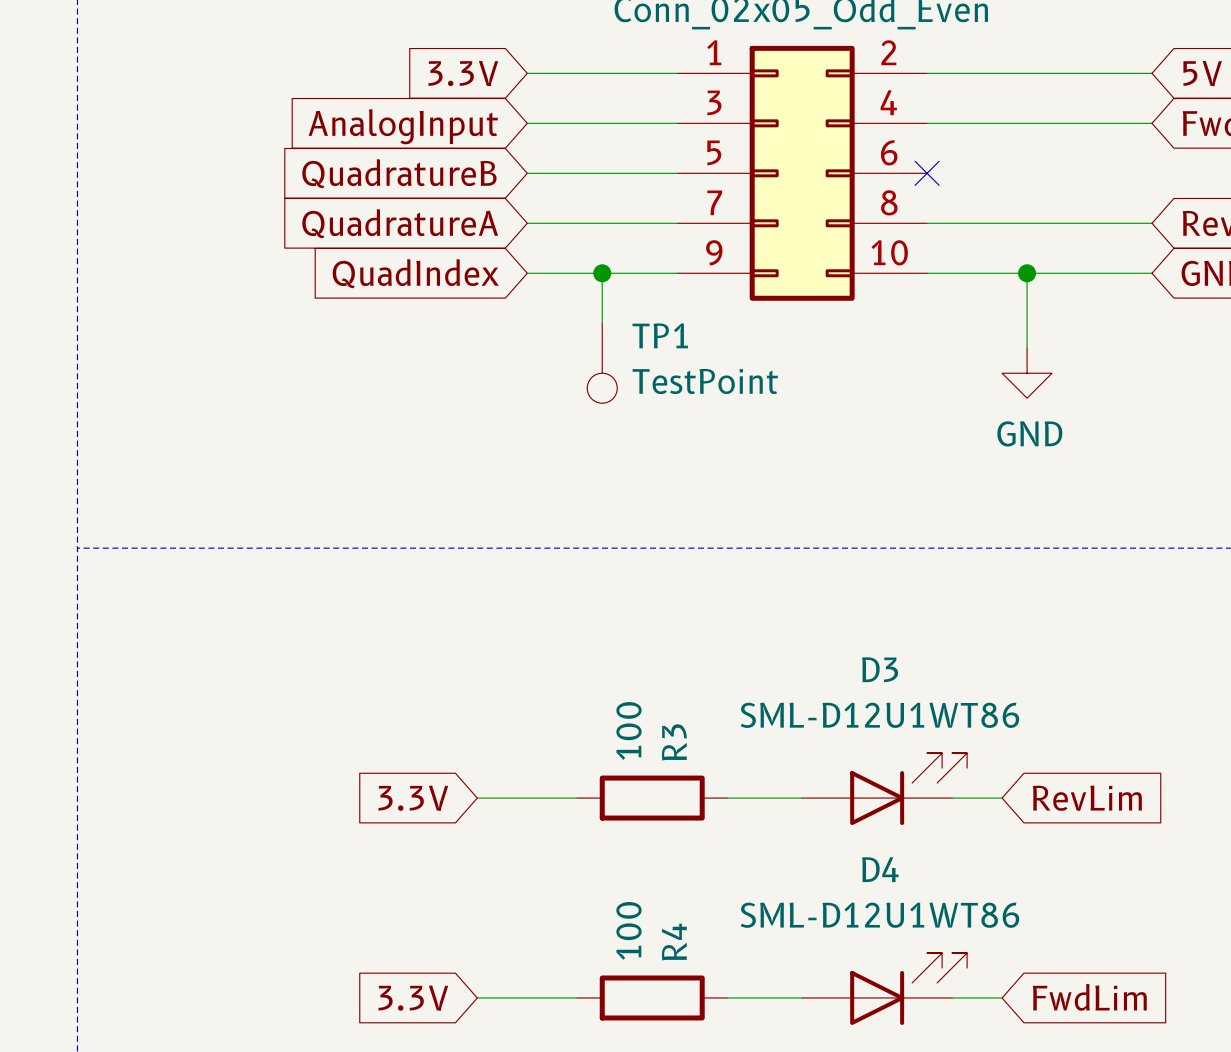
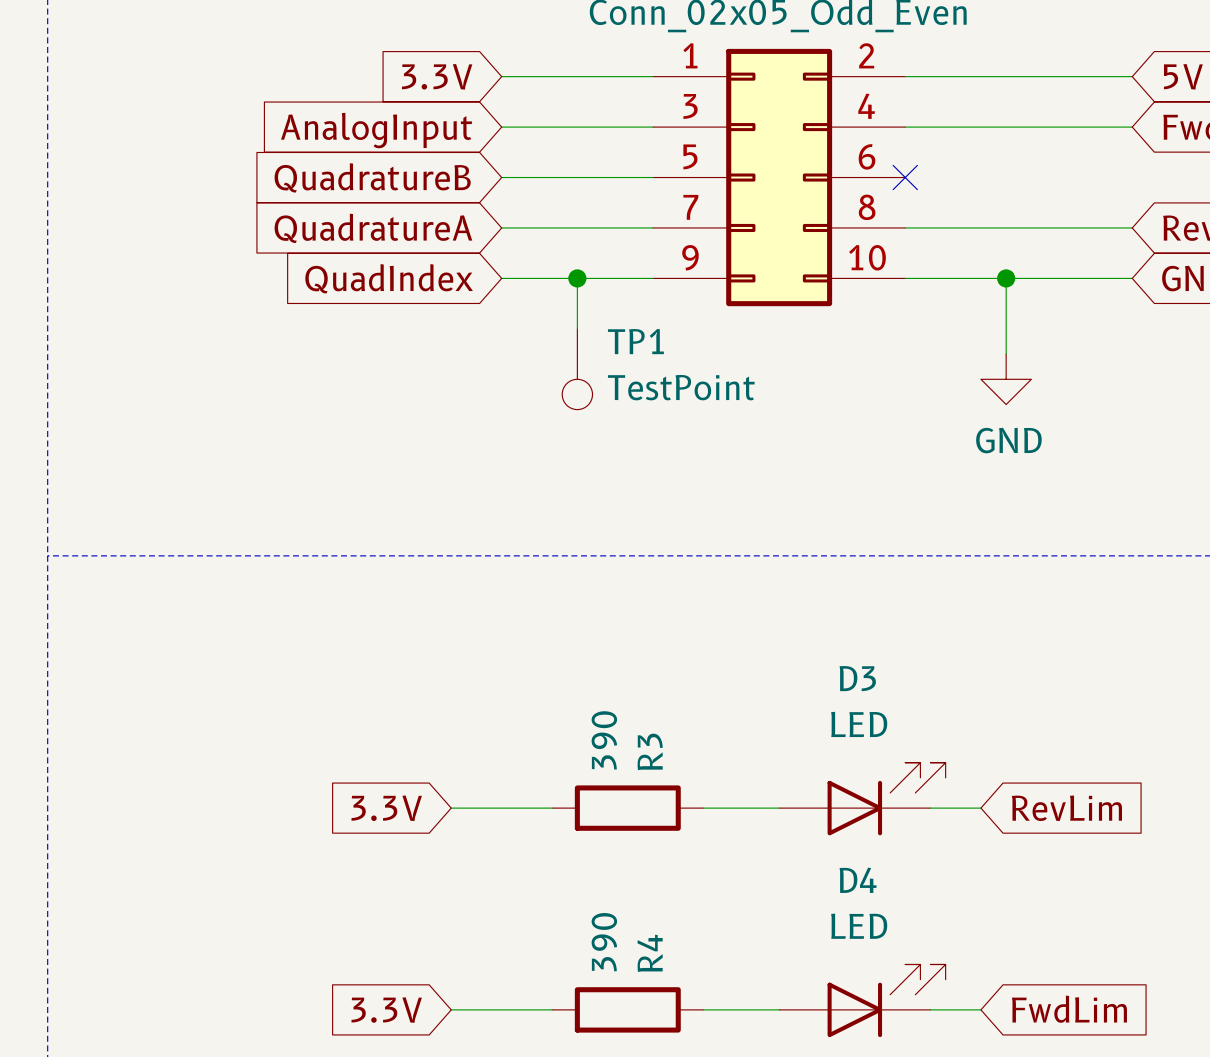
D3 value: SML-D12U1WT86 (879, 715) -> LED (859, 724)
R3 value: 100 (628, 730) -> 390 (604, 740)
D4 value: SML-D12U1WT86 (879, 915) -> LED (859, 926)
R4 value: 100 (628, 930) -> 390 (604, 942)

